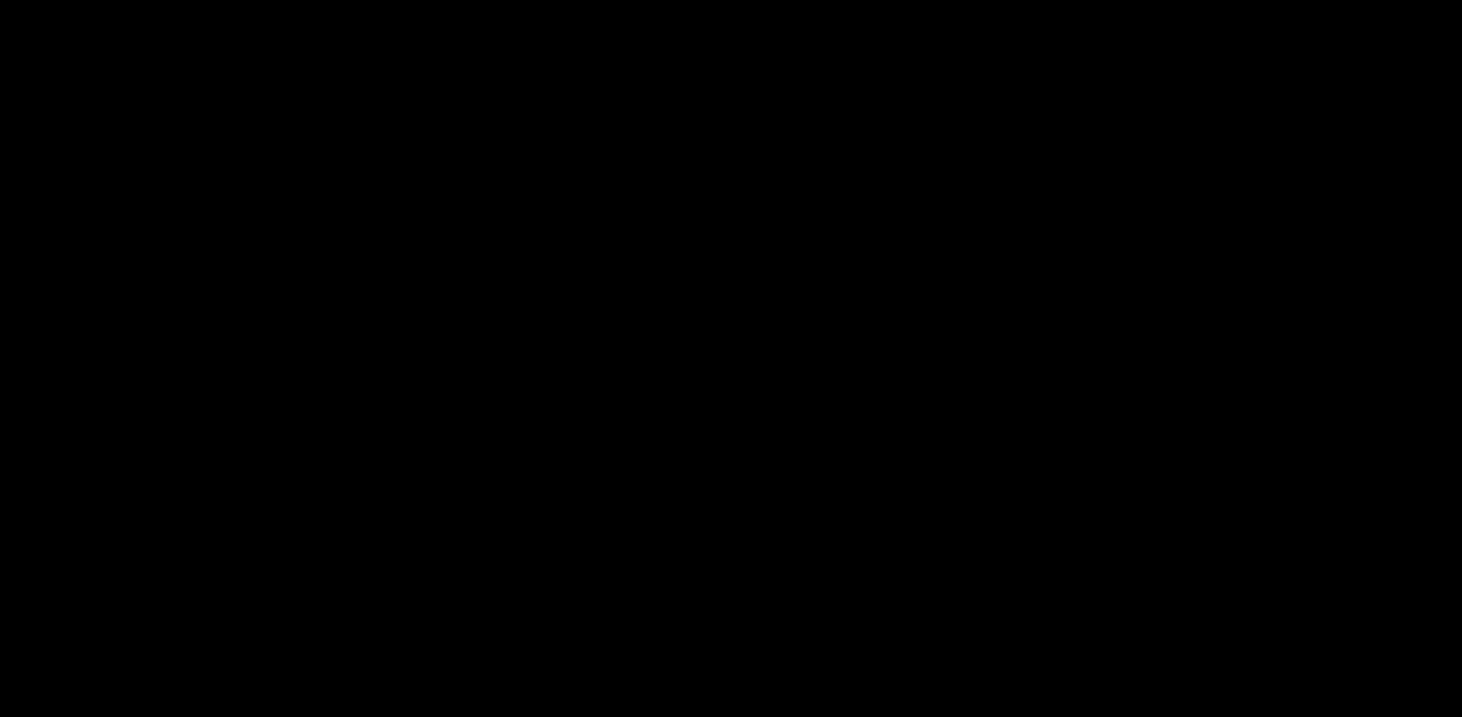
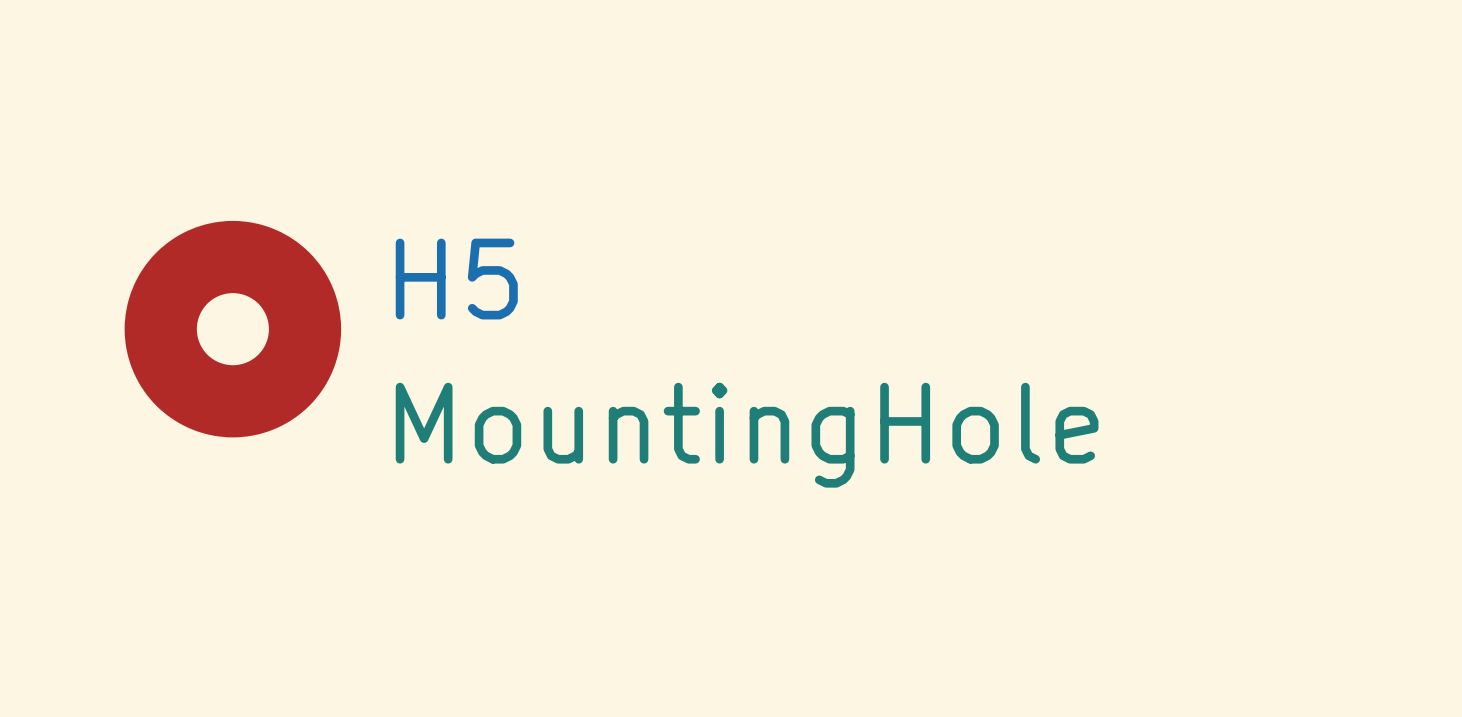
H5: none -> MountingHole (232, 329)

